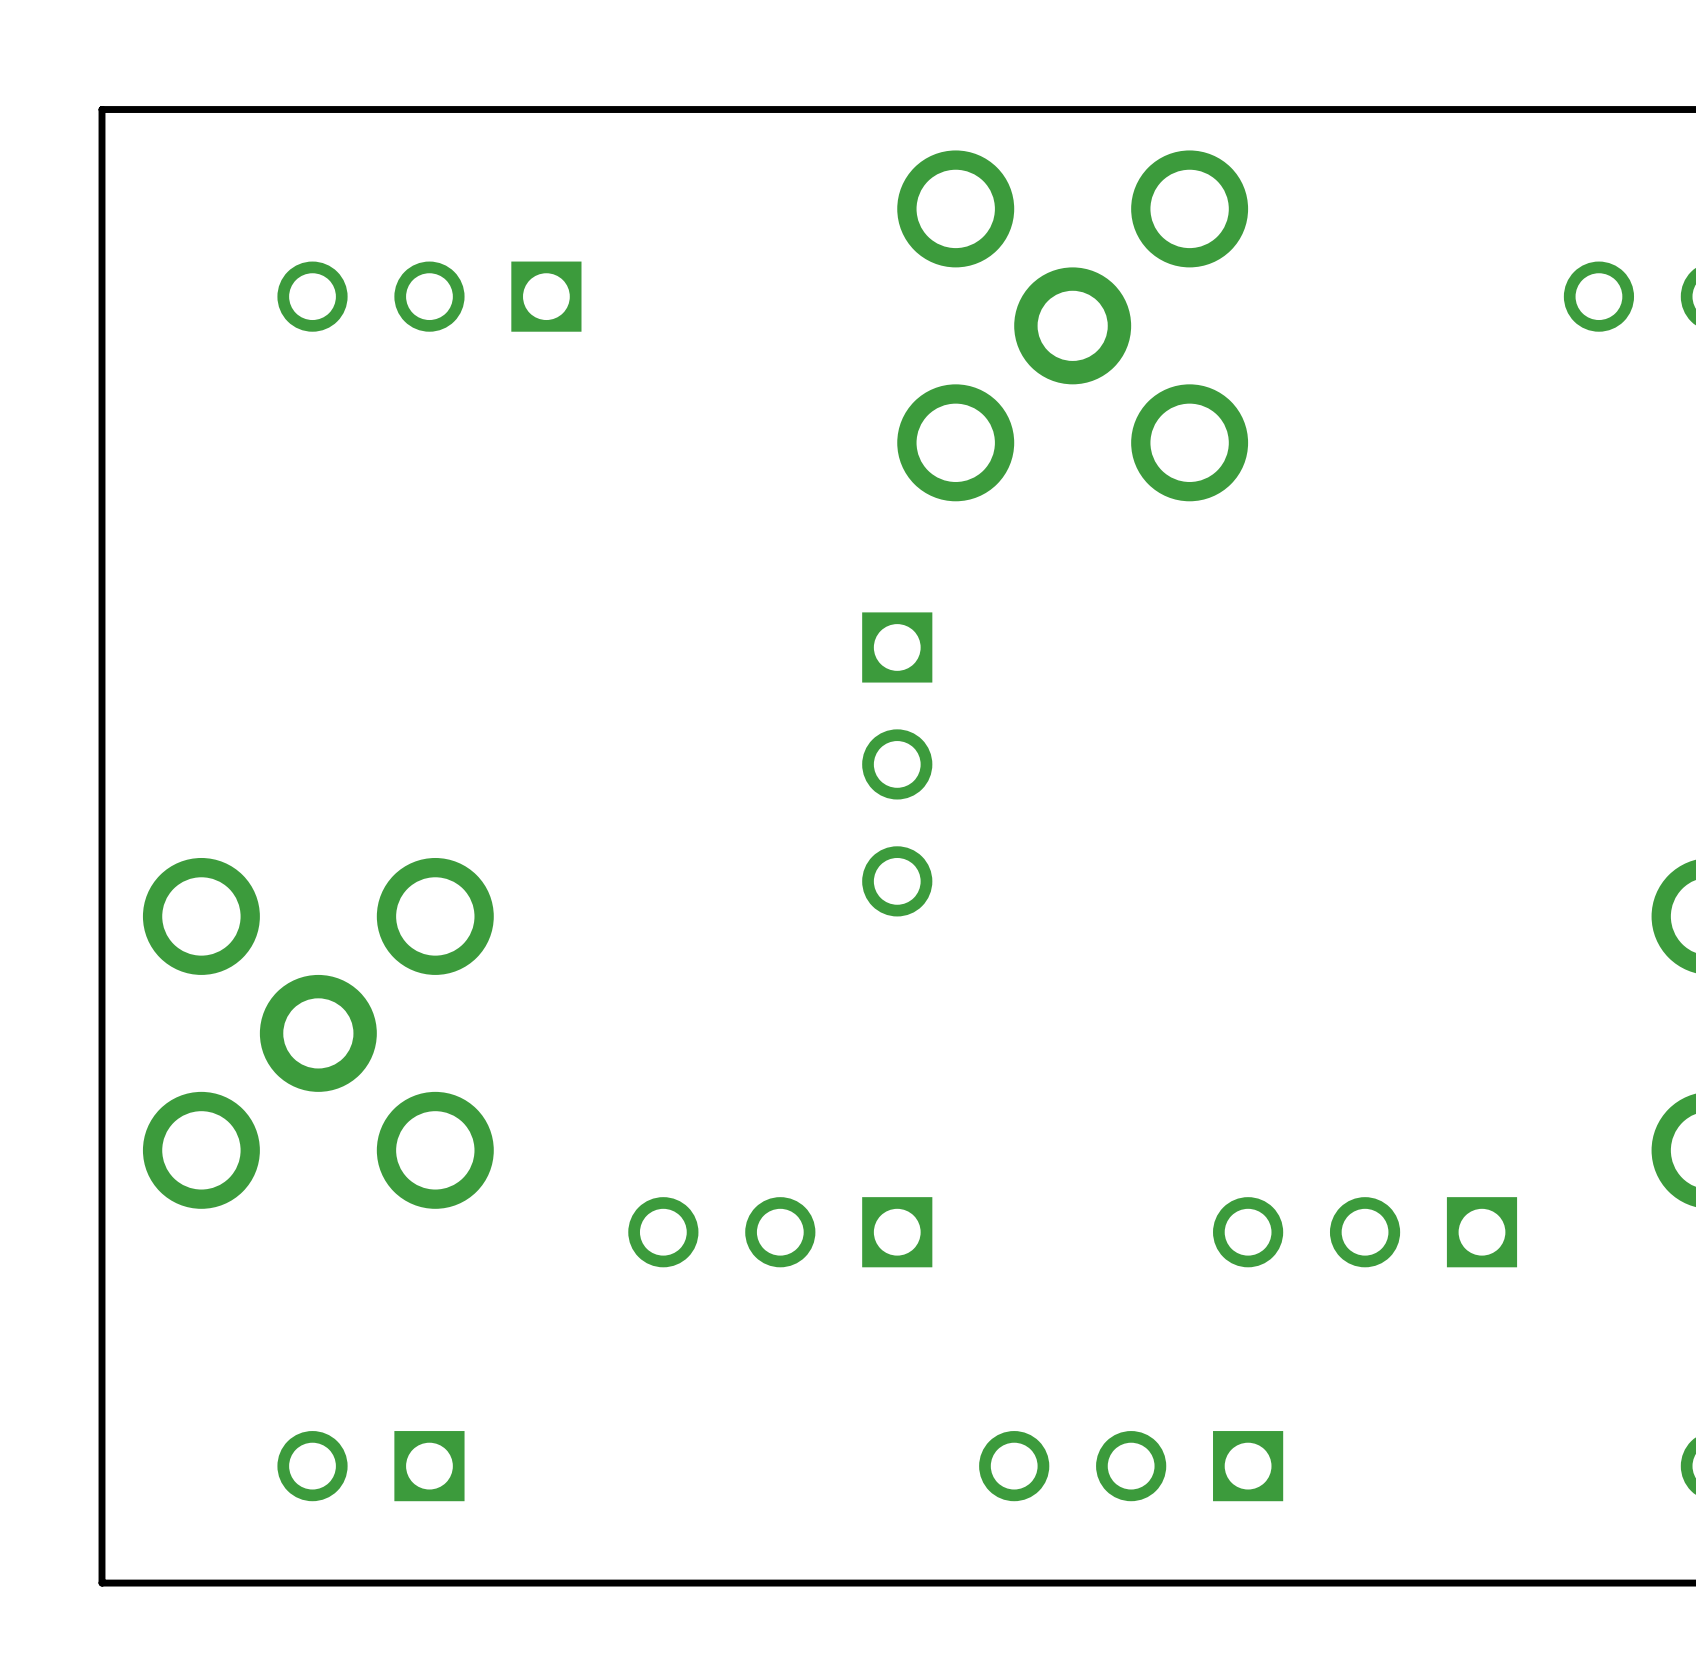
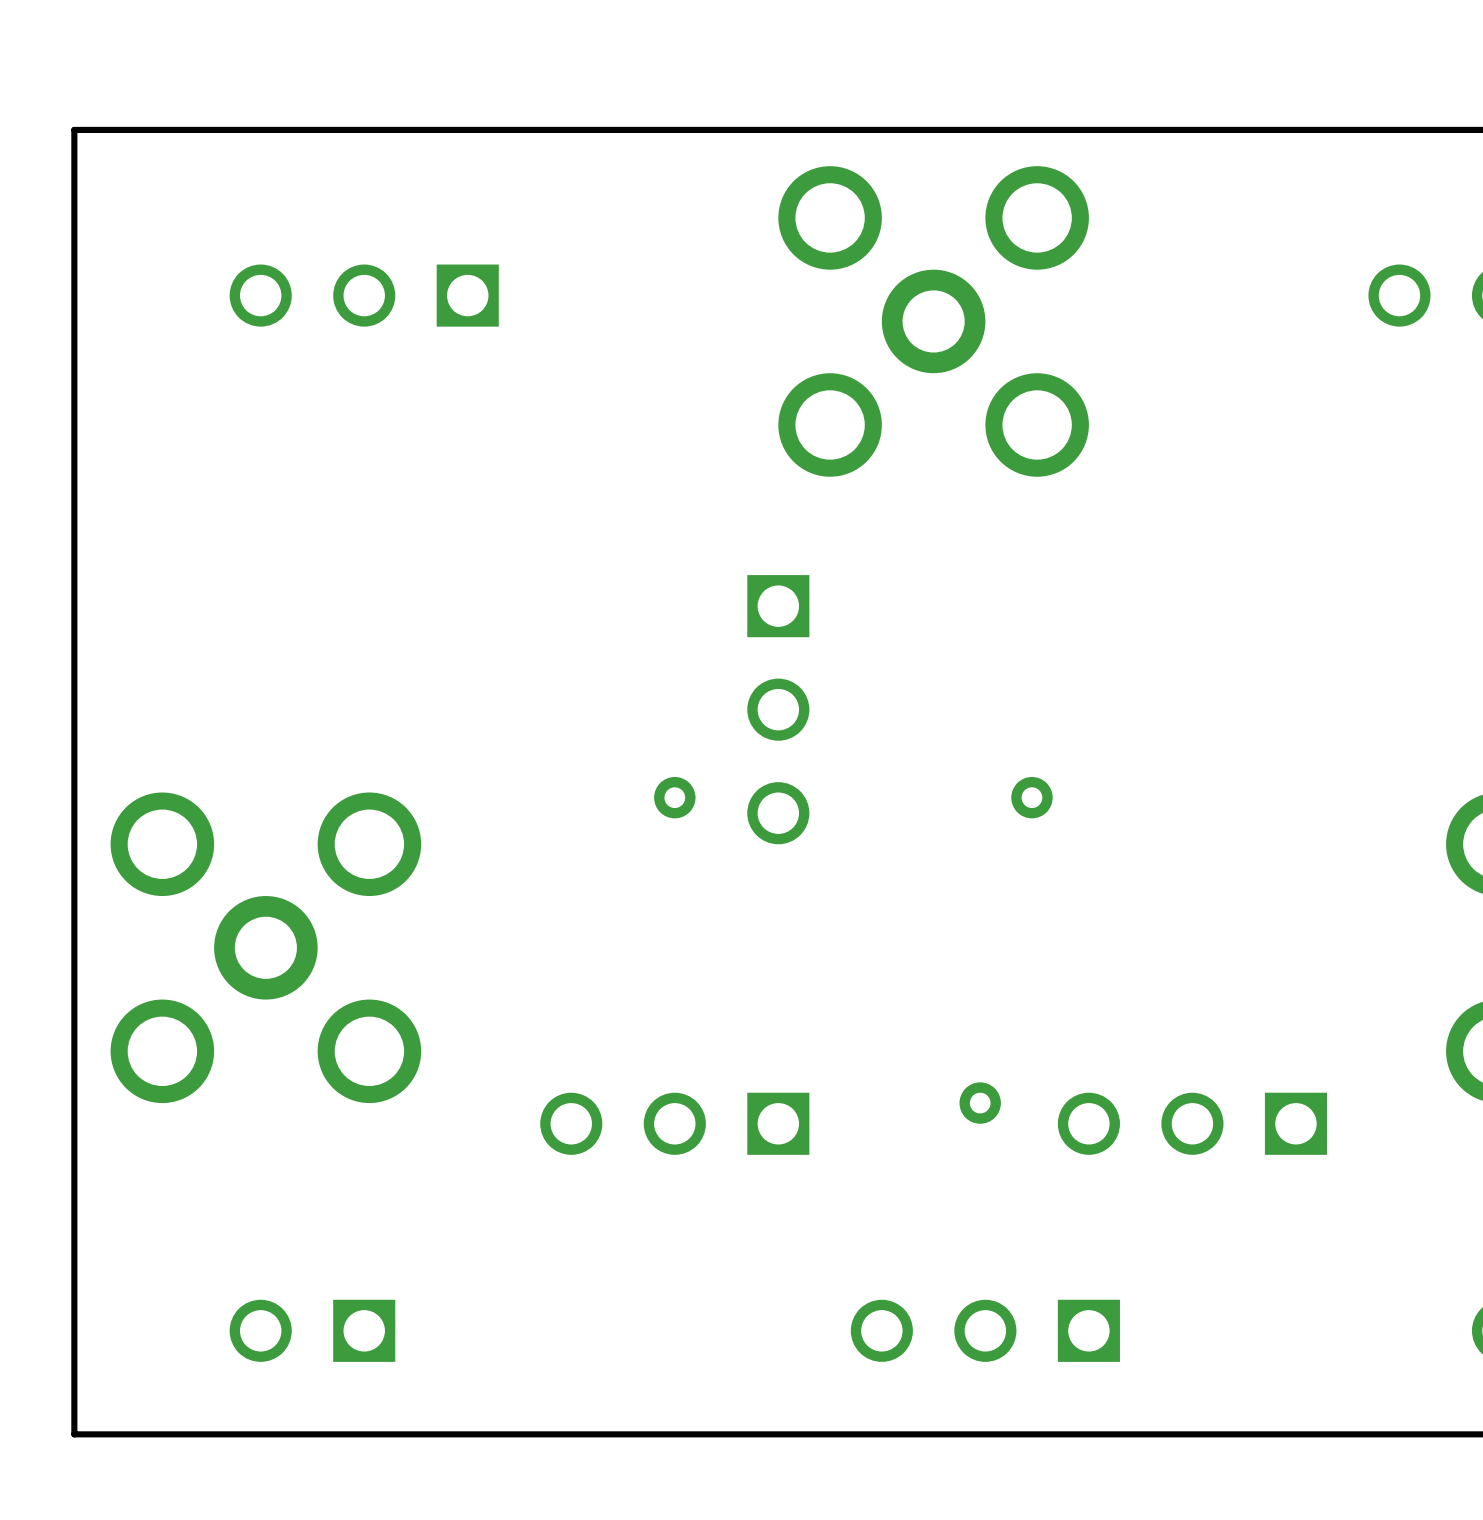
via: none -> (674, 797)
via: none -> (1031, 797)
via: none -> (980, 1103)

